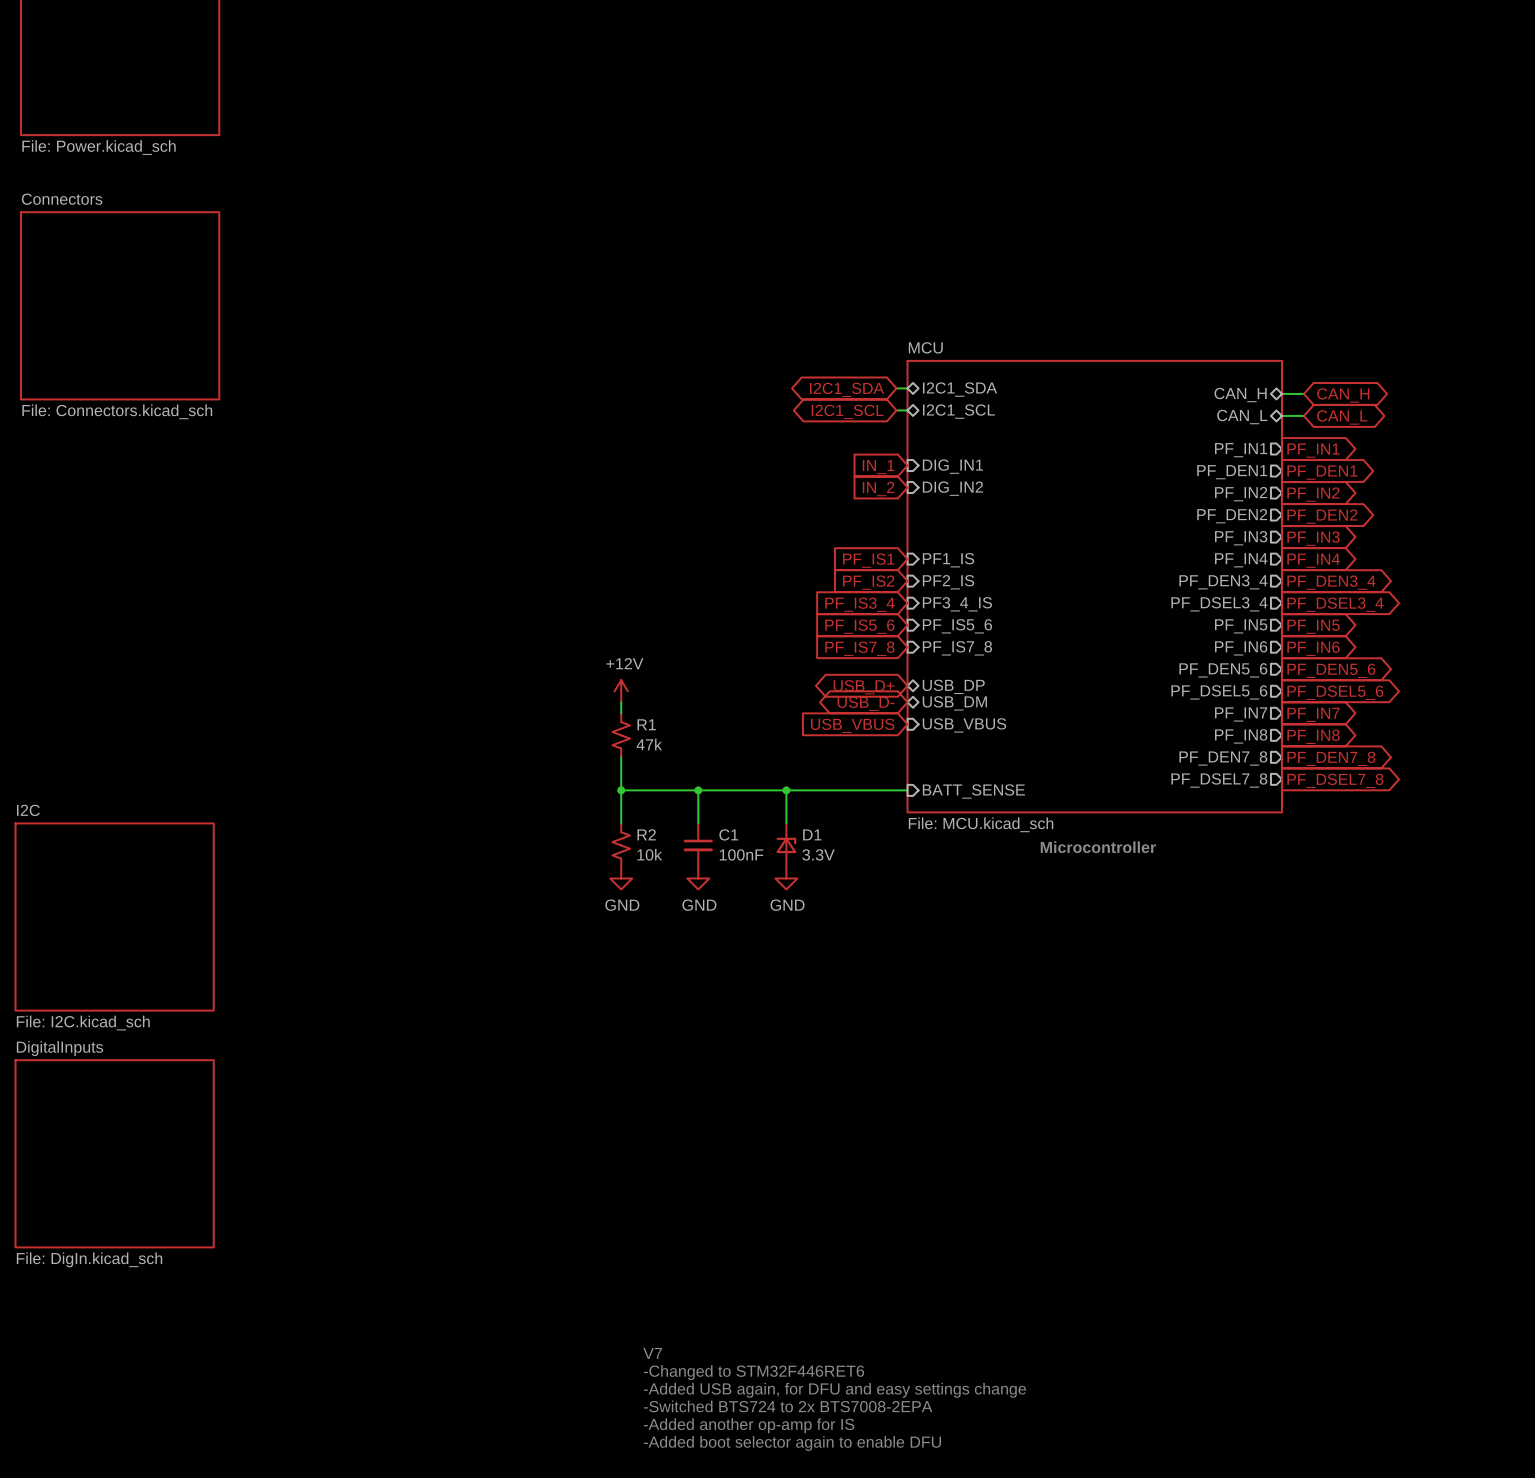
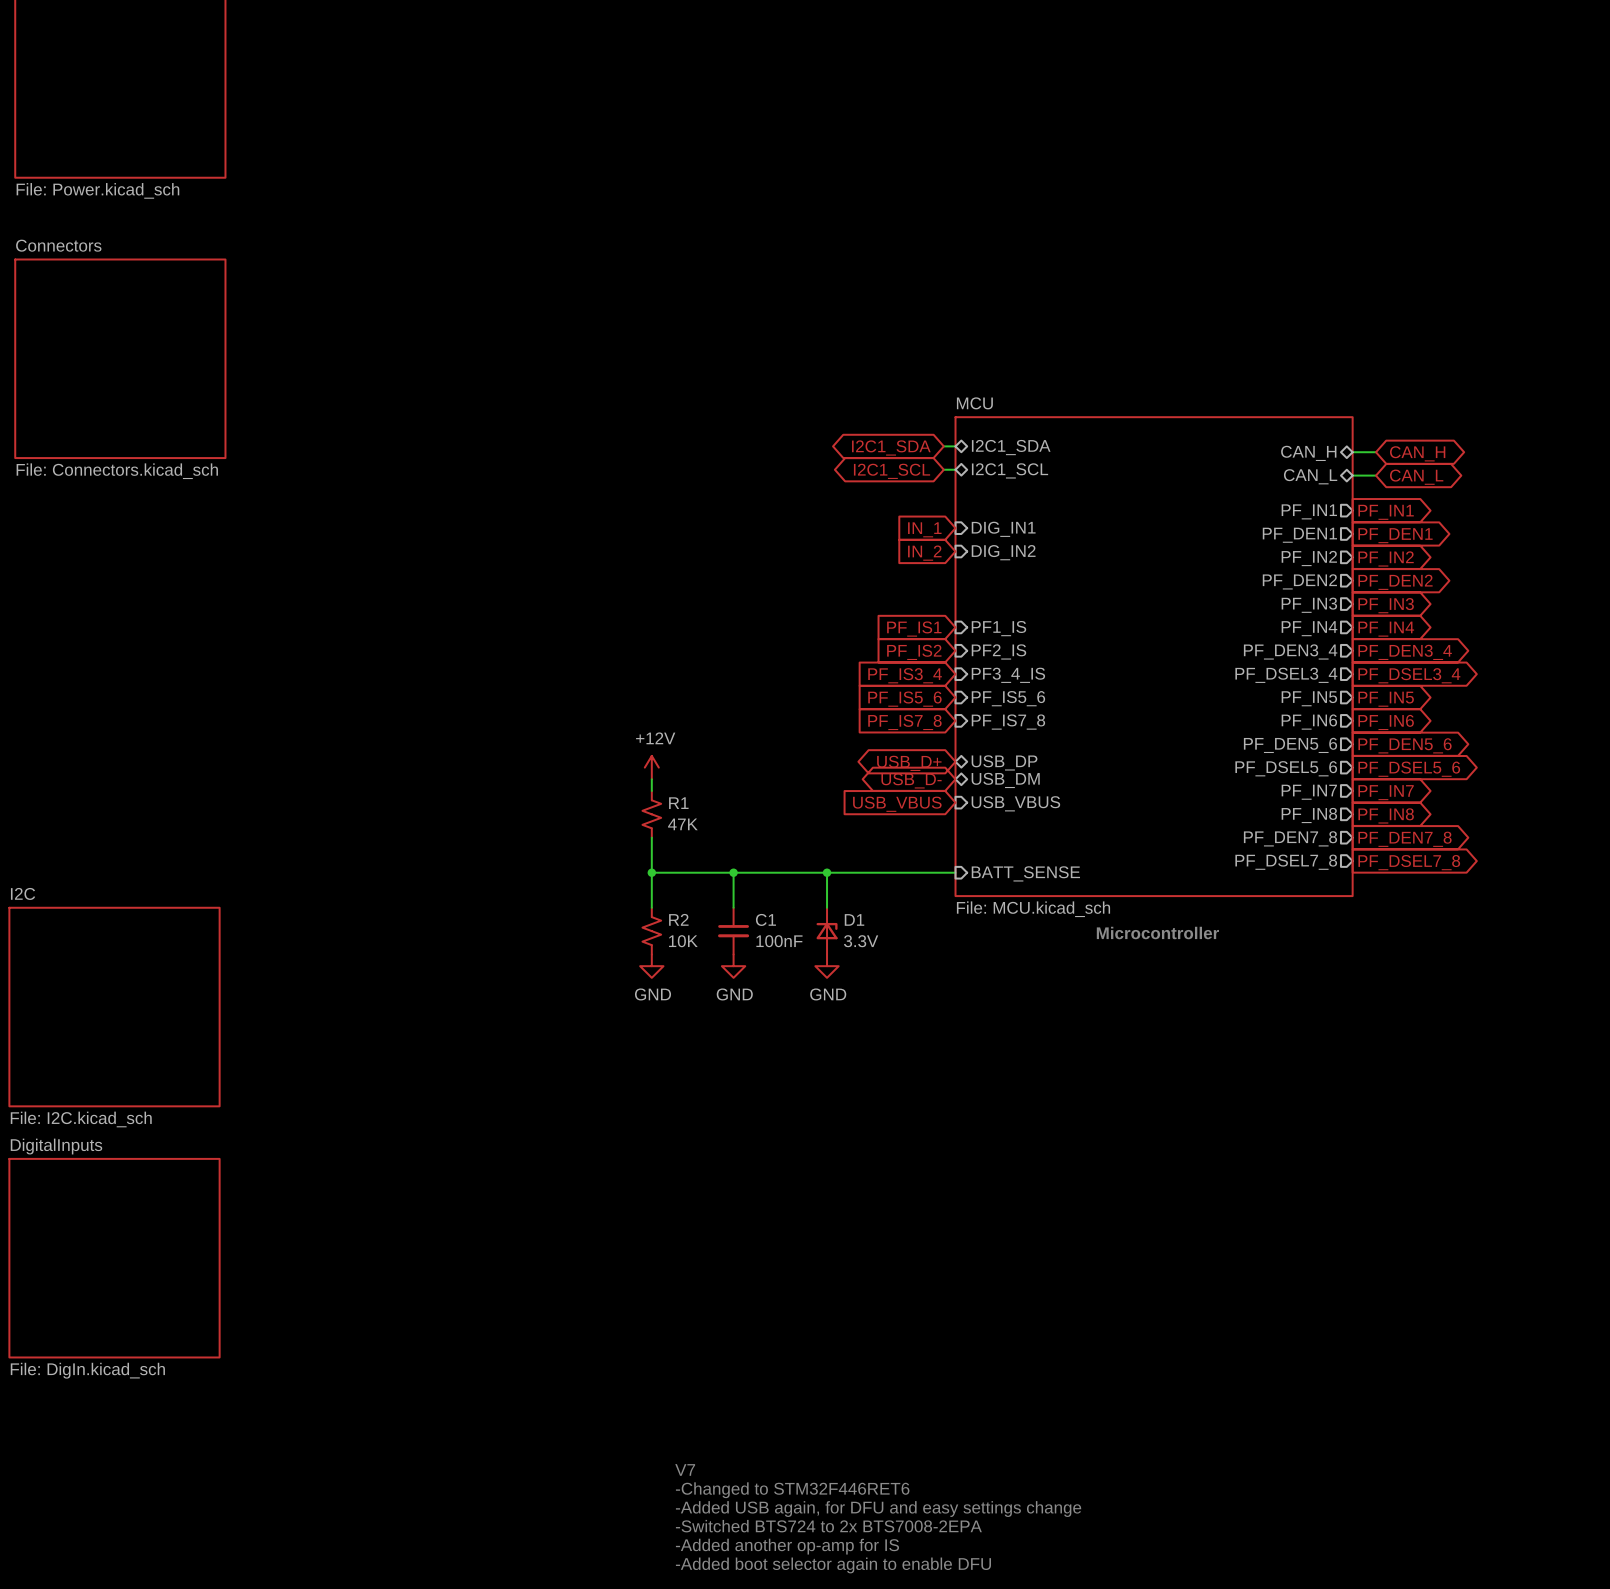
R1 value: 47k (649, 744) -> 47K (682, 824)
R2 value: 10k (649, 854) -> 10K (683, 941)

